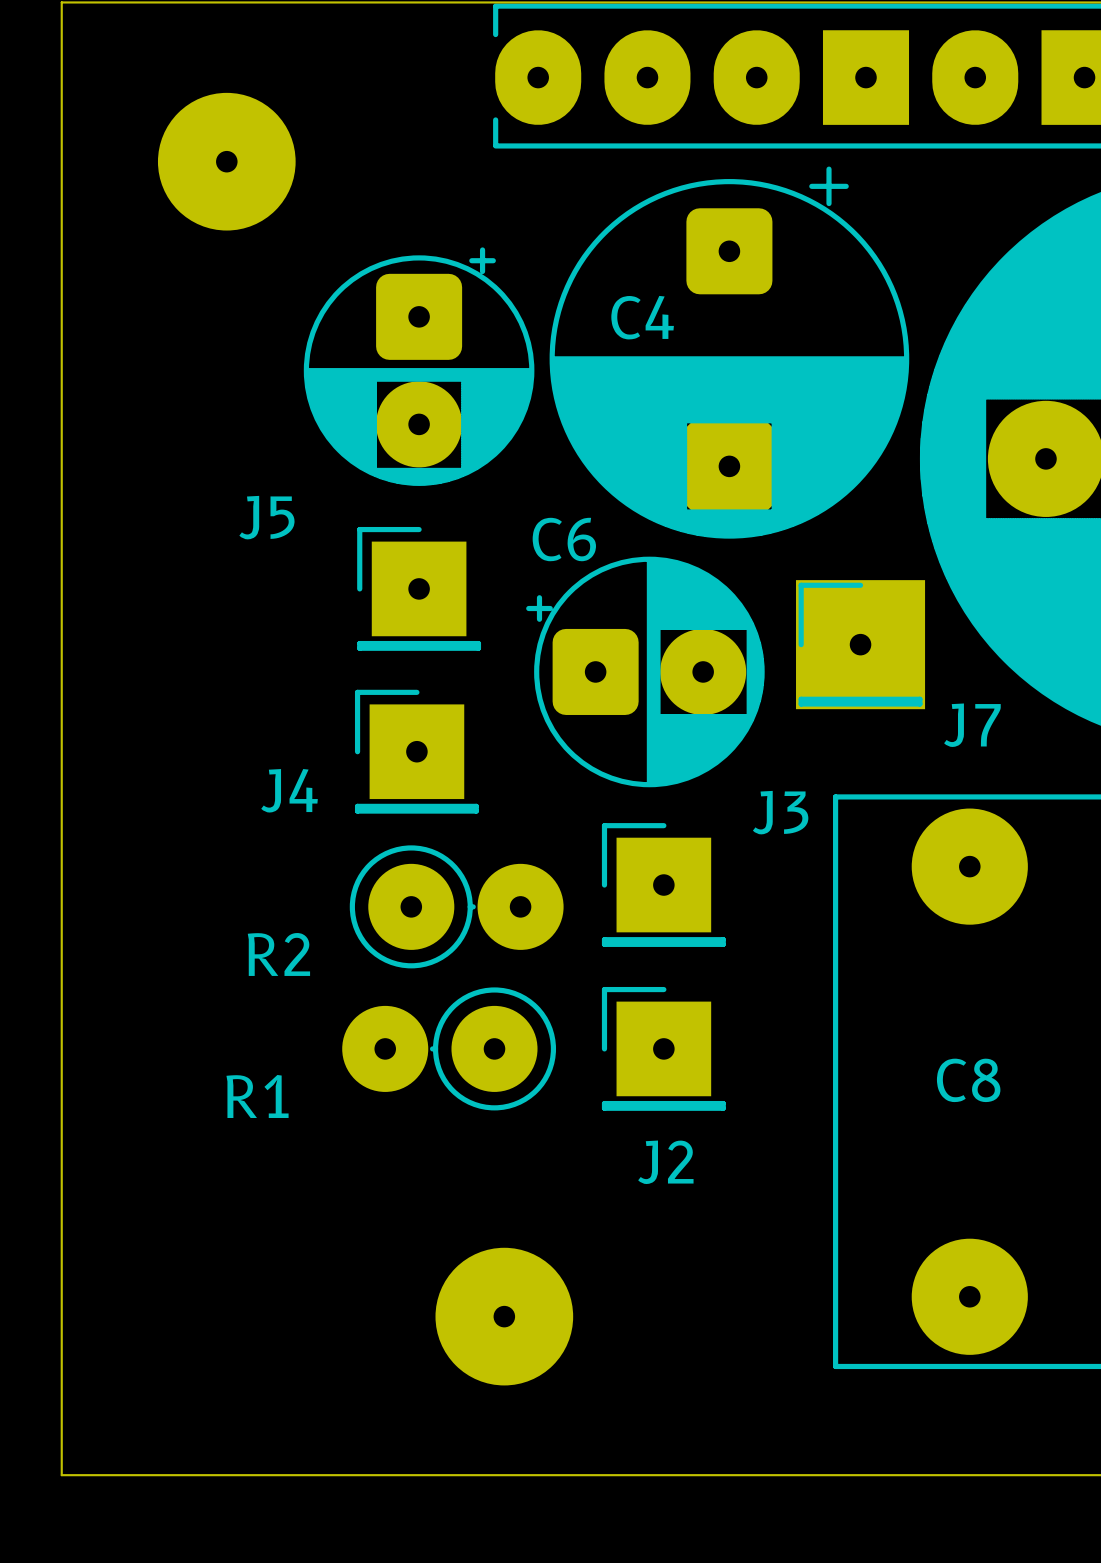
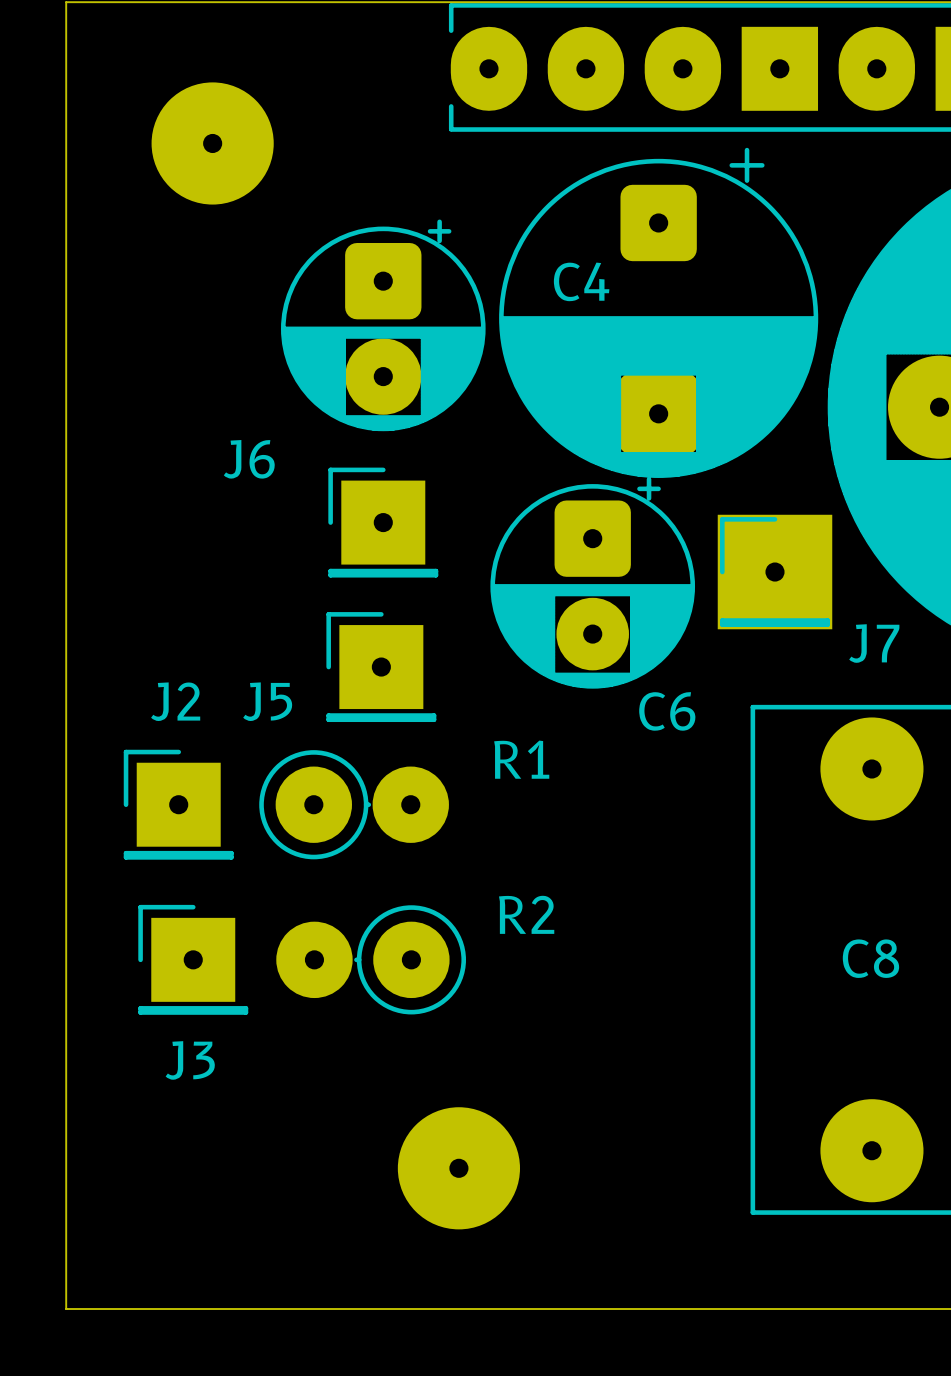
J5 name: J5 (266, 517) -> J6 (249, 459)
C6 name position: C6 (564, 539) -> C6 (667, 711)
C6 footprint: [526, 556, 765, 788] -> [490, 477, 696, 689]
J4 name: J4 (289, 790) -> J5 (267, 701)
J3 name position: J3 (780, 812) -> J3 (190, 1060)
J3 position: (663, 885) -> (193, 959)
R2 rotation: 0° (456, 906) -> 180° (371, 959)
R2 position: (456, 906) -> (371, 959)
R1 rotation: 0° (449, 1048) -> 180° (354, 804)
R1 position: (449, 1048) -> (354, 804)
J2 position: (663, 1048) -> (178, 804)
J2 name position: J2 (665, 1162) -> J2 (175, 701)

